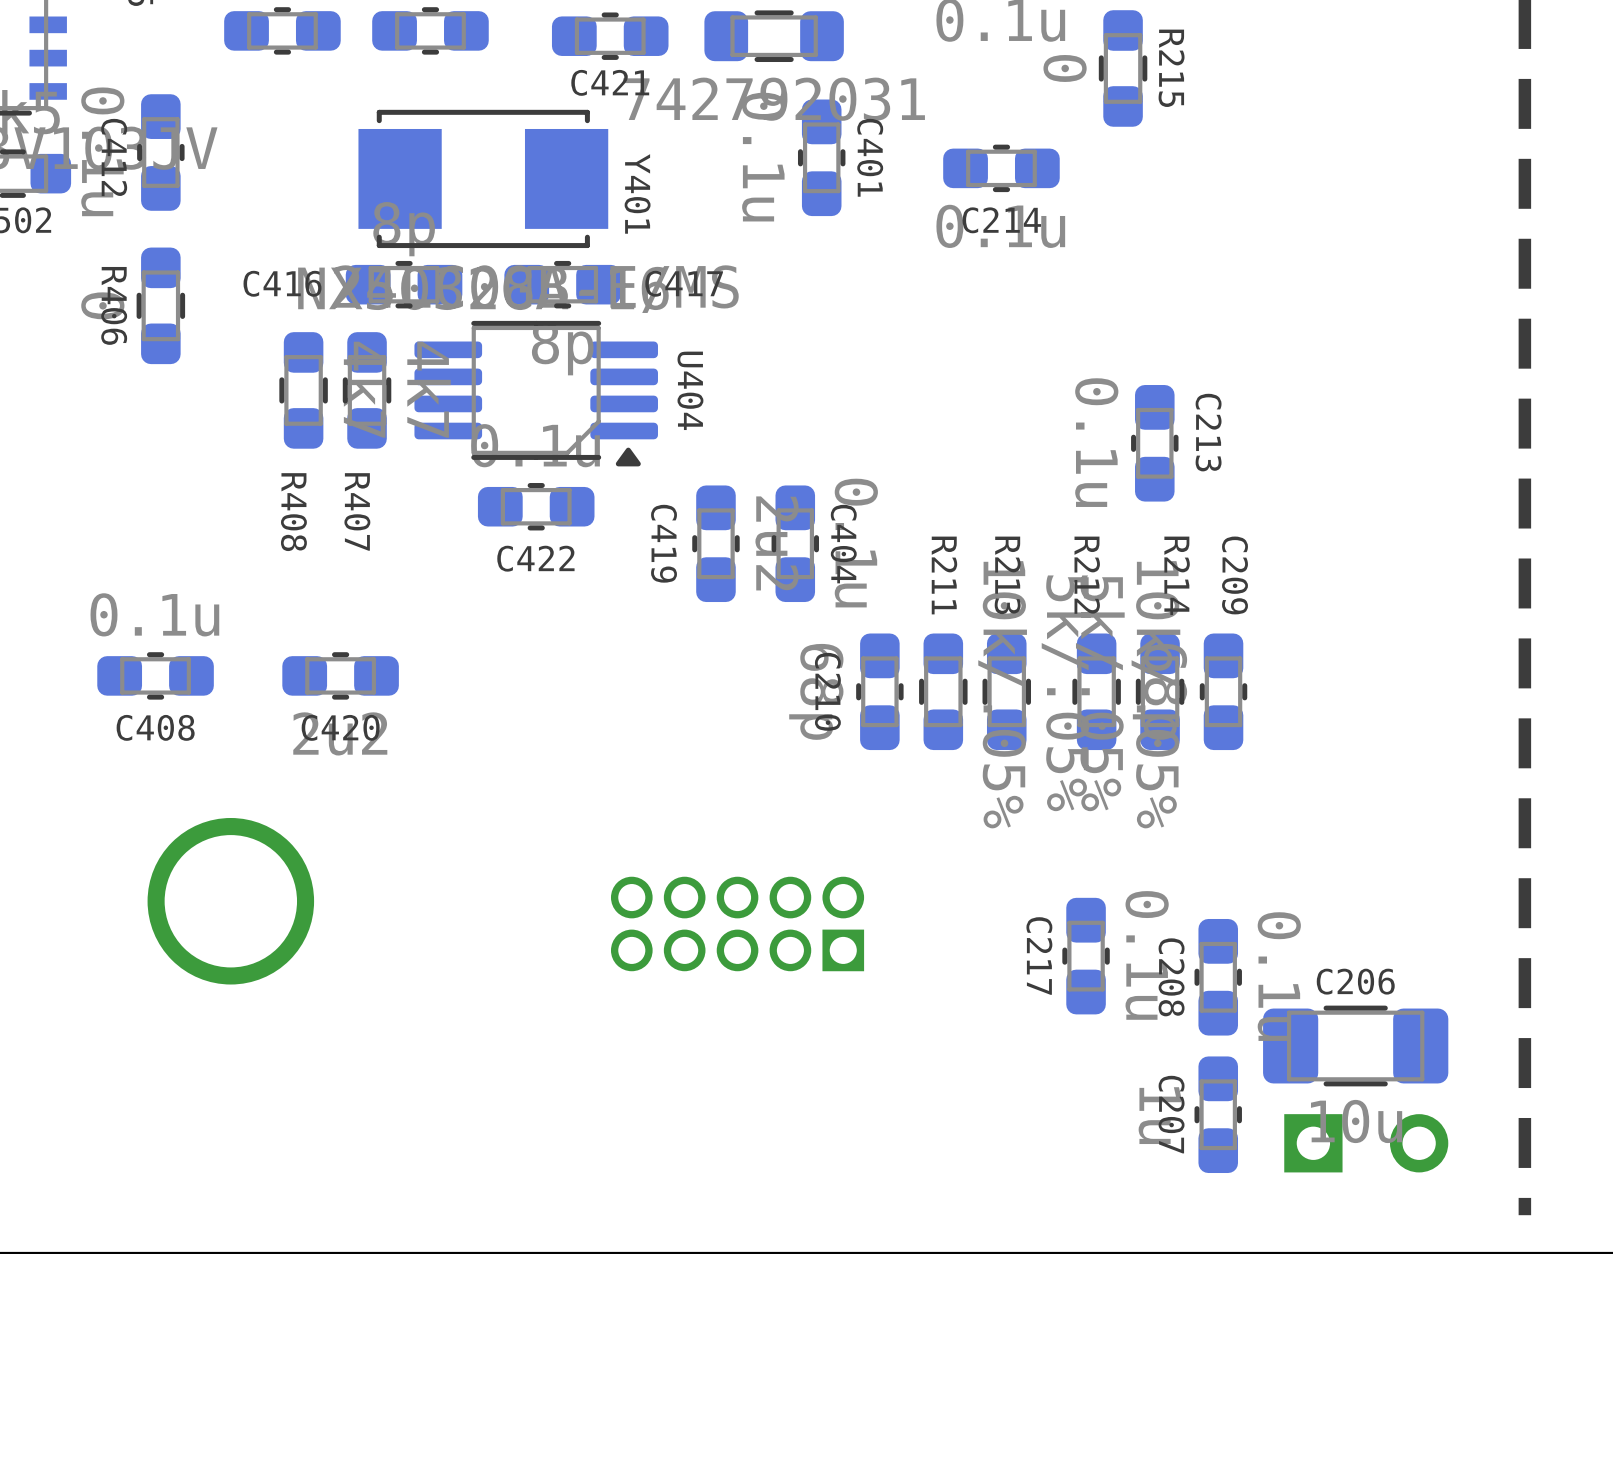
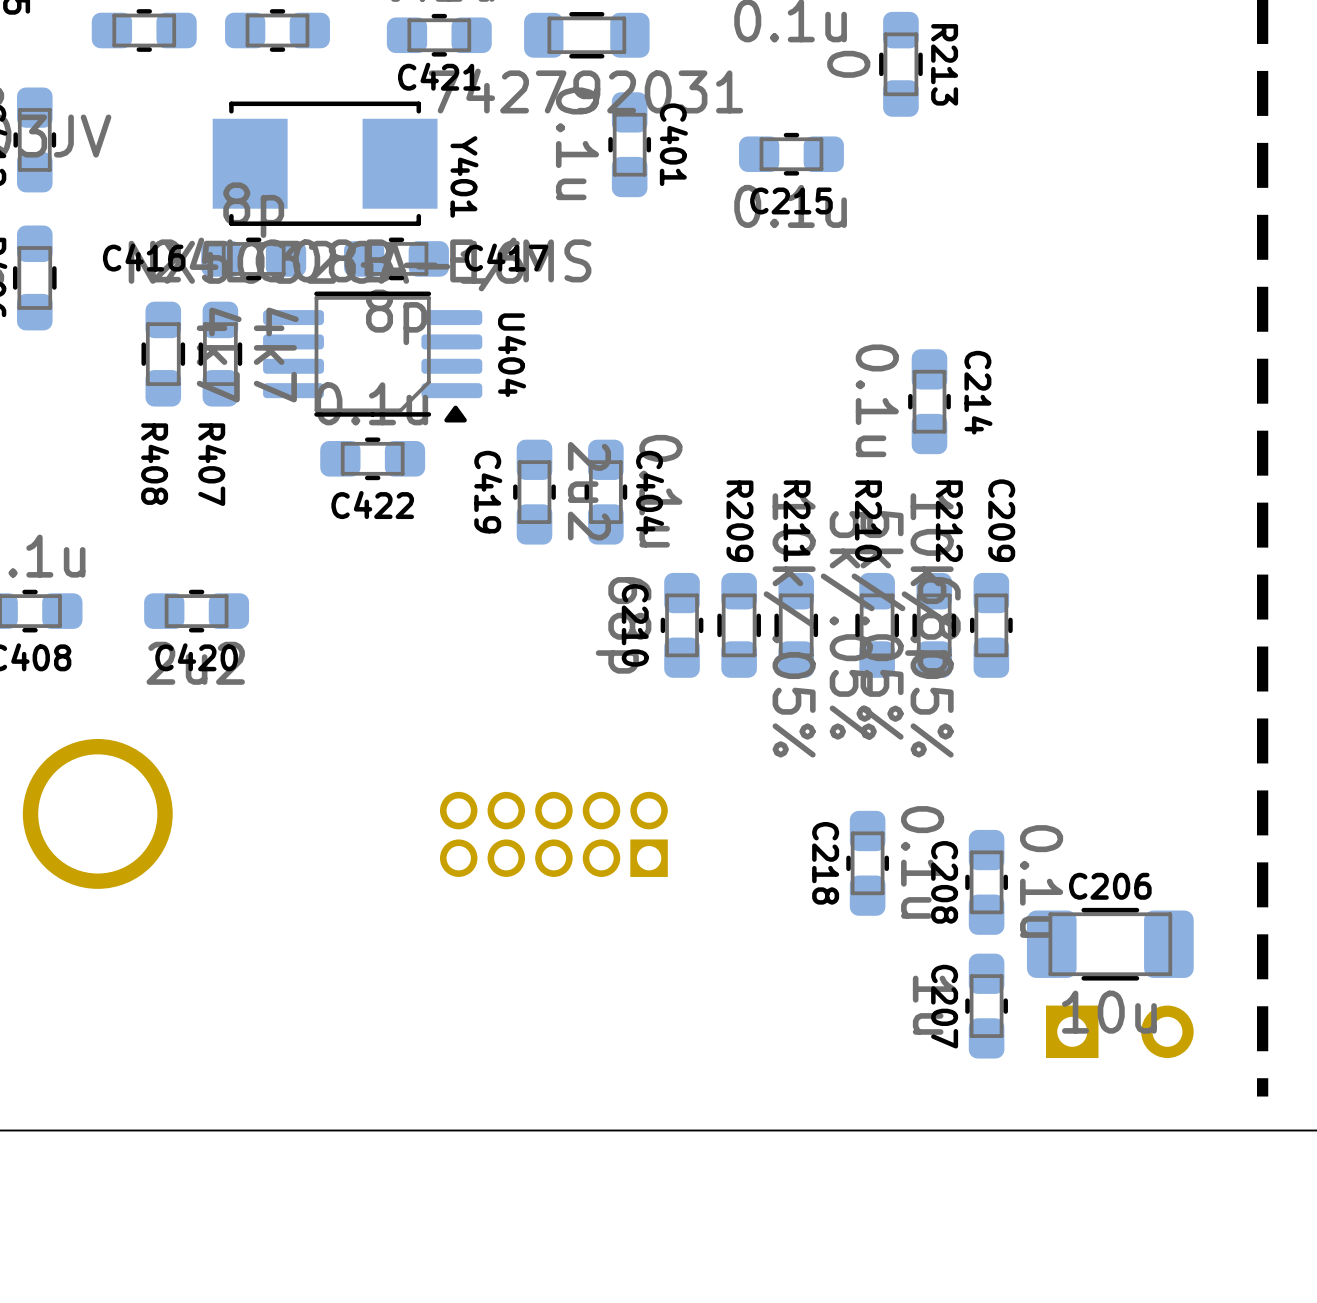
R215 name: R215 (1171, 68) -> R213 (944, 64)
C214 name: C214 (1001, 220) -> C215 (791, 200)
C213 name: C213 (1208, 432) -> C214 (978, 392)
R211 name: R211 (944, 575) -> R209 (739, 521)
R213 name: R213 (1007, 575) -> R211 (797, 521)
R212 name: R212 (1087, 575) -> R210 (868, 521)
R214 name: R214 (1177, 575) -> R212 (949, 521)
C217 name: C217 (1039, 955) -> C218 (825, 863)

